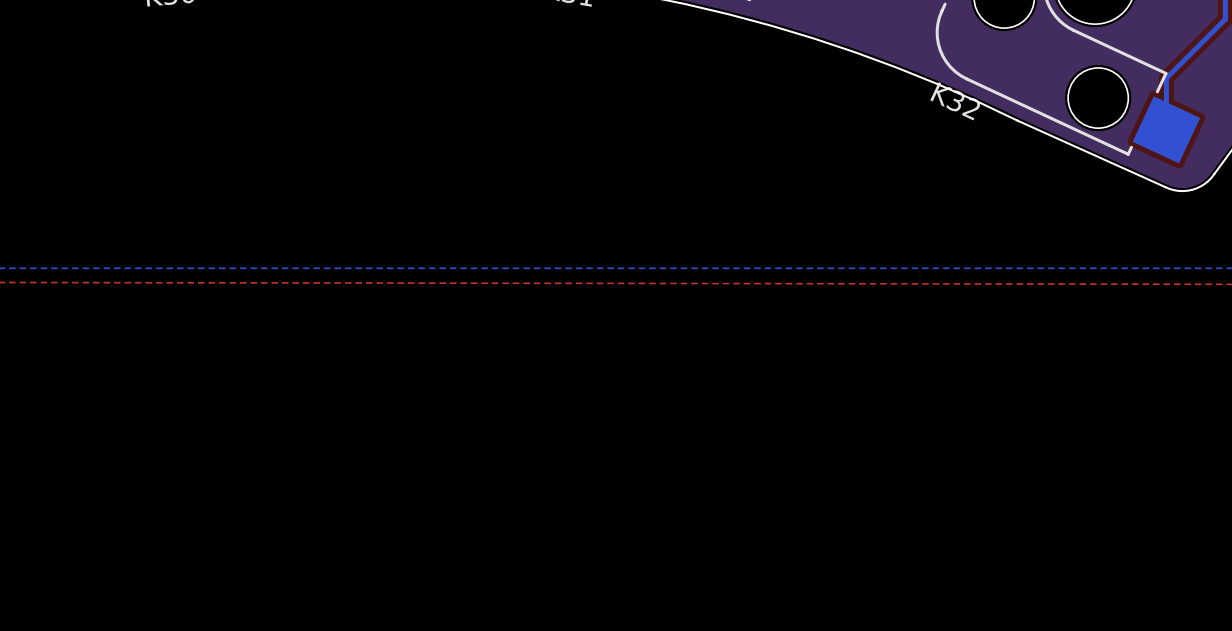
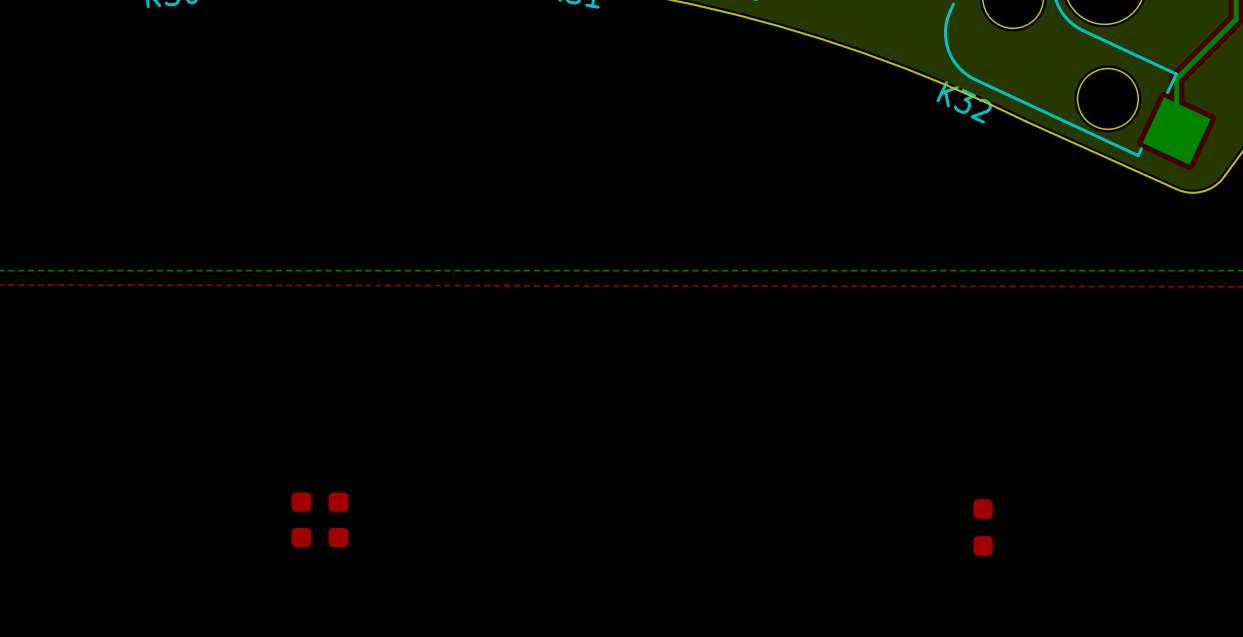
part: none -> (319, 502)
part: none -> (983, 527)
part: none -> (319, 537)

